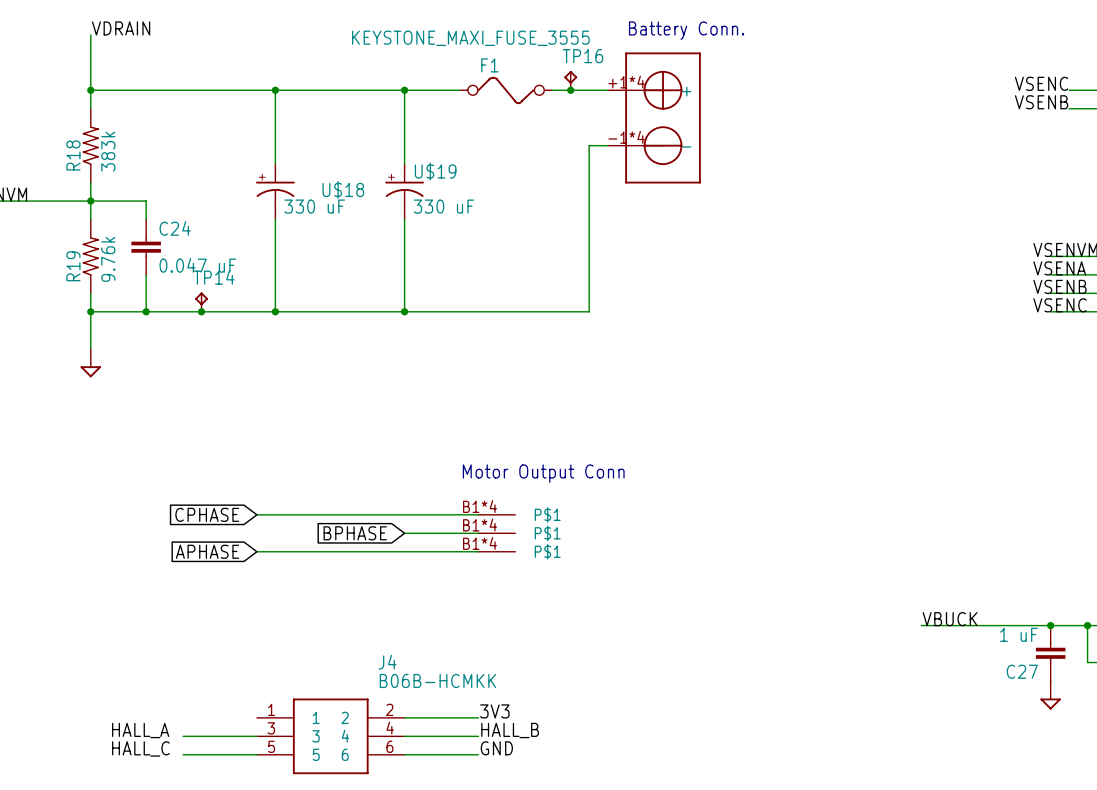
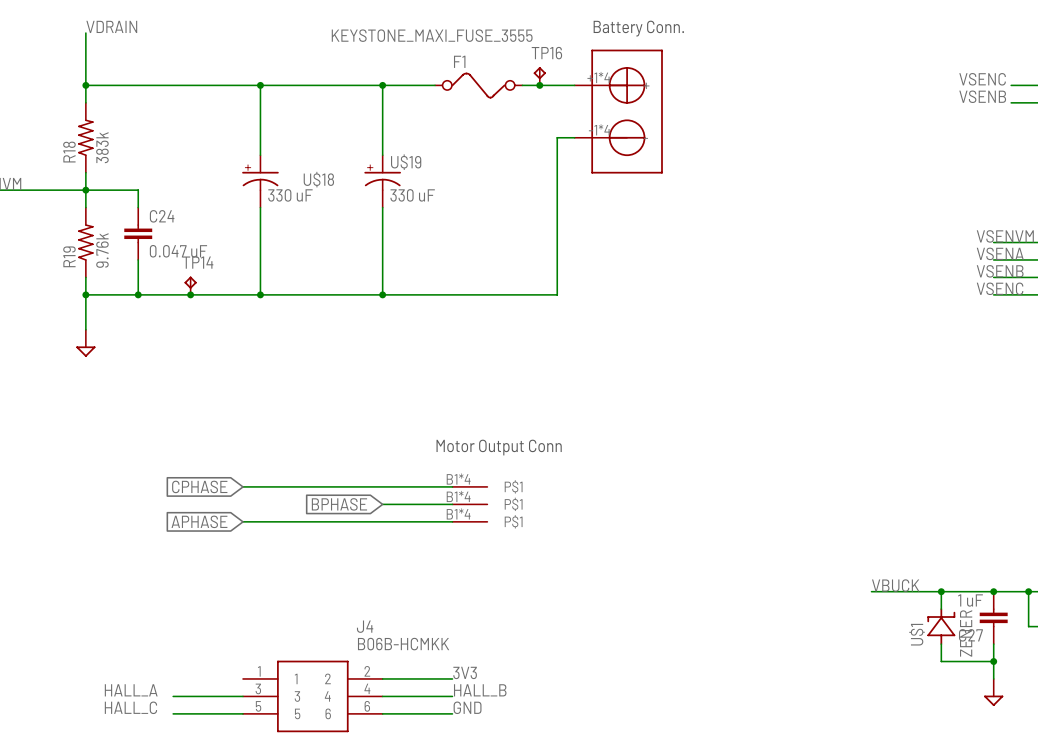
wire: none -> (941, 591) (941, 609)
junction: none -> (941, 591)
U$1: none -> ZENER (941, 626)
wire: none -> (941, 644) (941, 661) (993, 661)
power symbol position: (1050, 695) -> (993, 692)
junction: none -> (993, 661)

